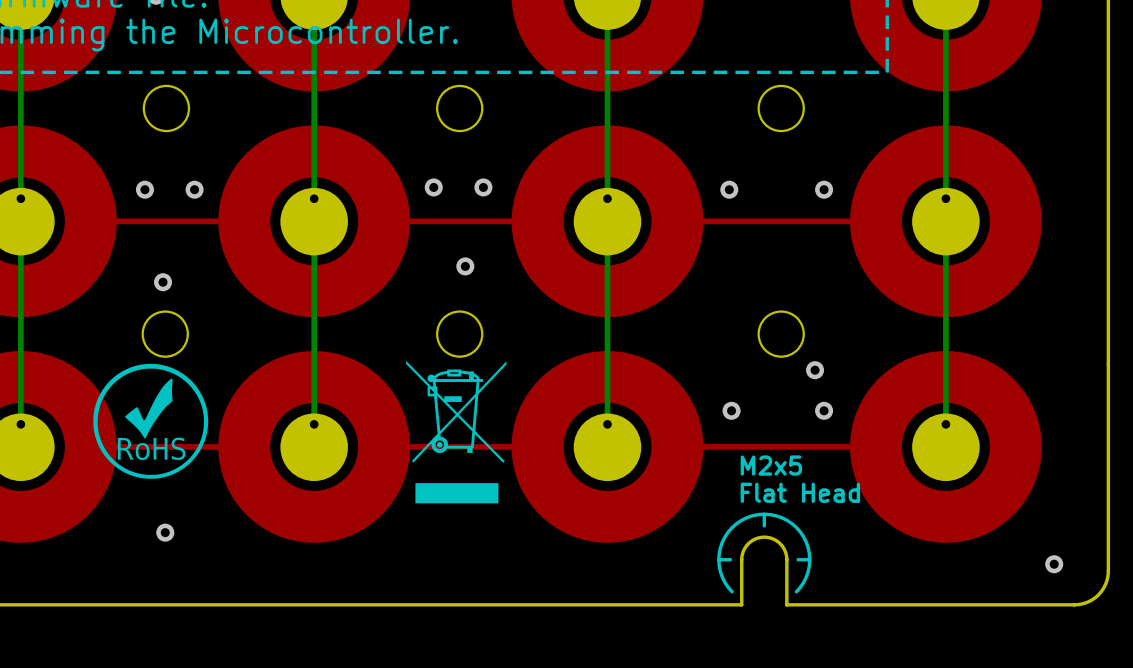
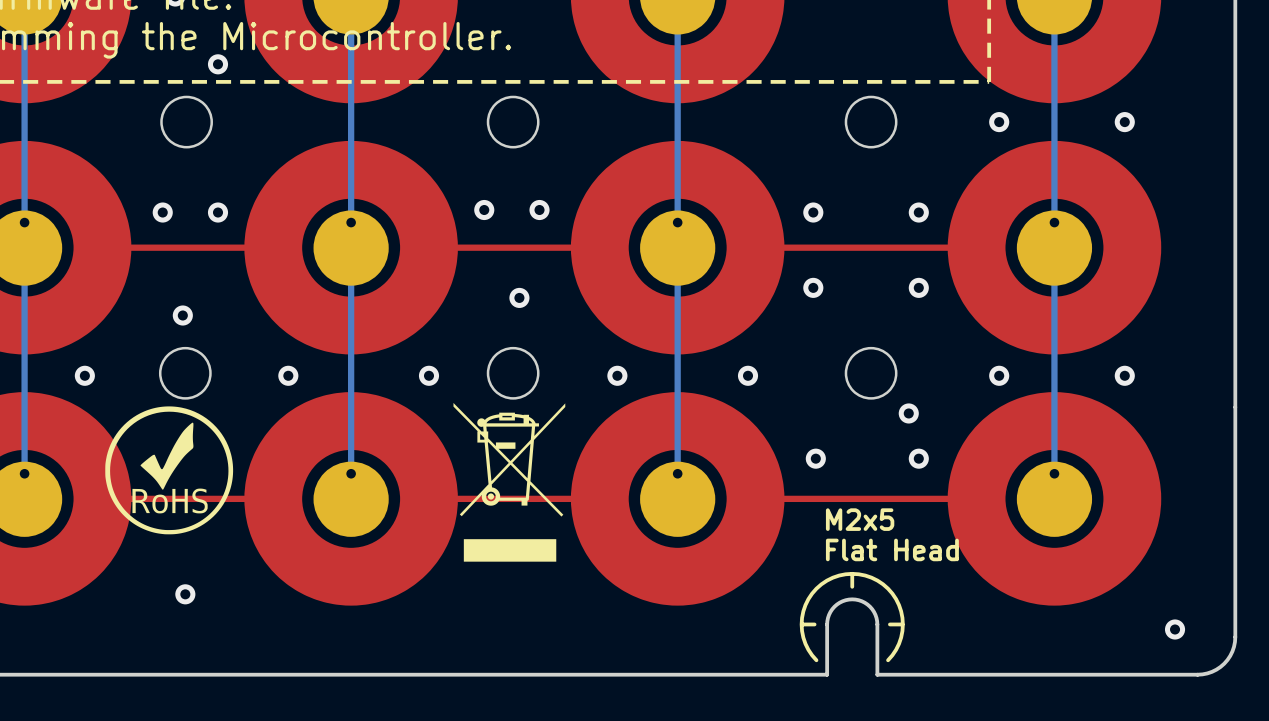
via: none -> (218, 64)
via: none -> (999, 122)
via: none -> (1124, 122)
via: none -> (813, 287)
via: none -> (918, 287)
via: none -> (84, 375)
via: none -> (288, 375)
via: none -> (429, 375)
via: none -> (617, 375)
via: none -> (748, 375)
via: none -> (999, 375)
via: none -> (1124, 375)

